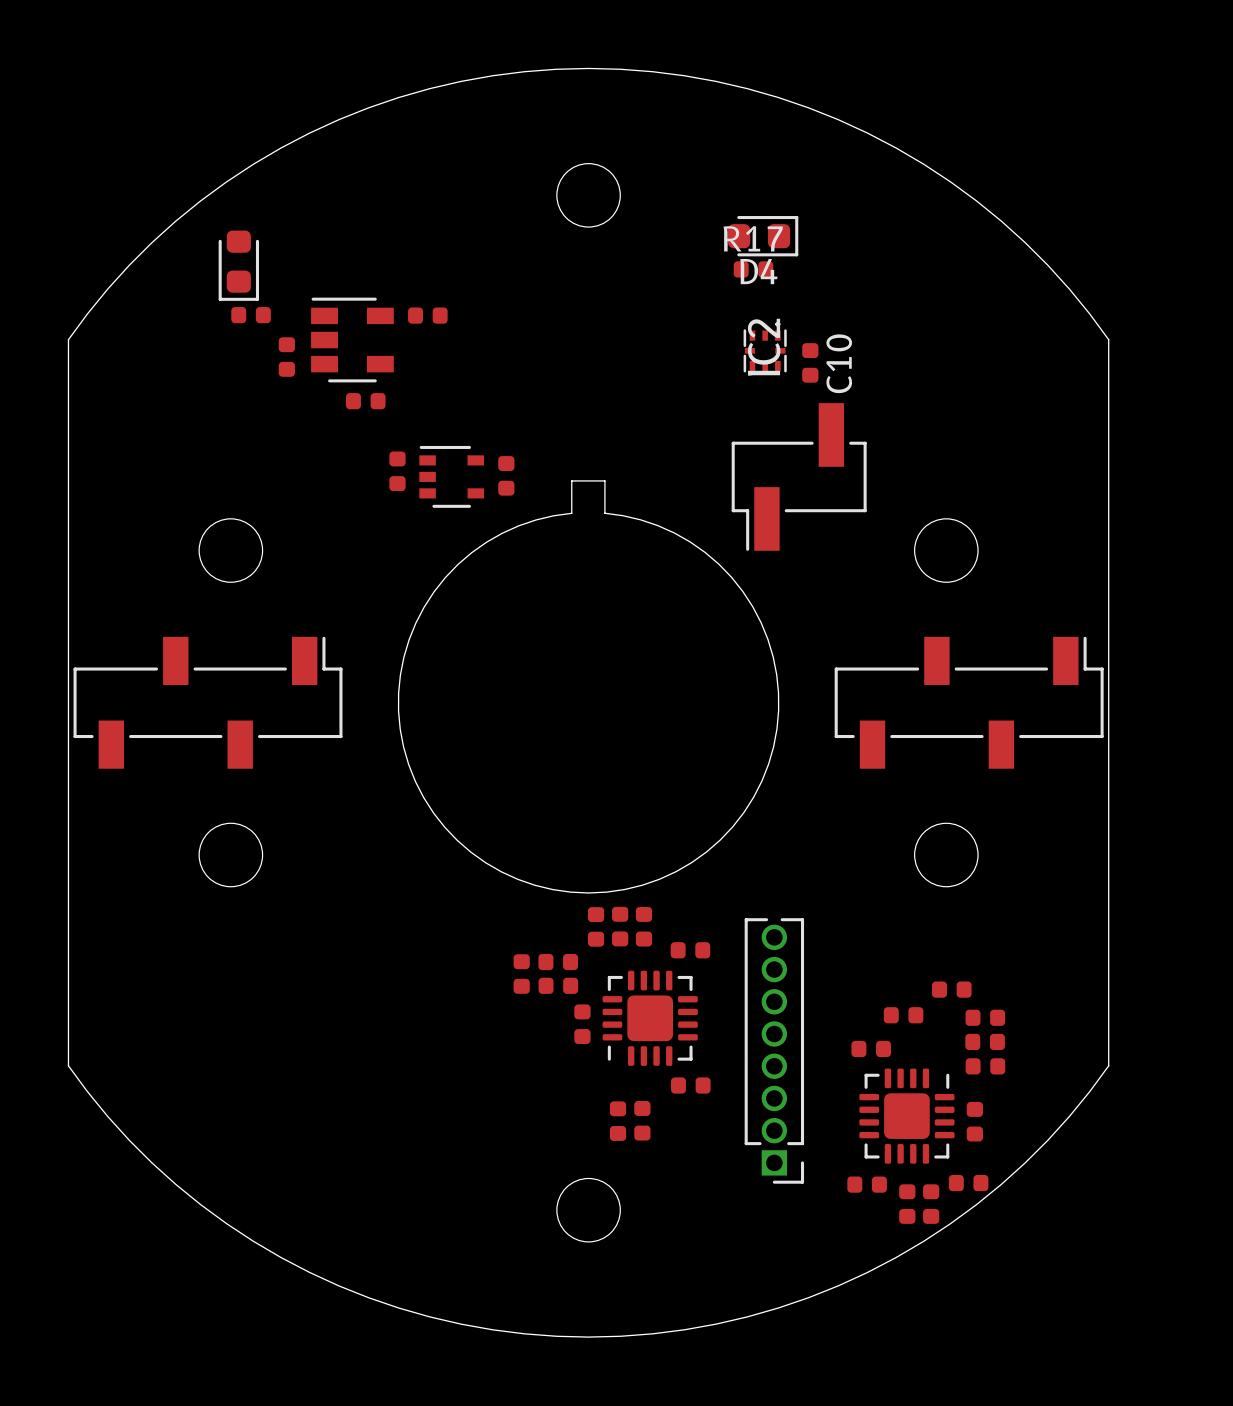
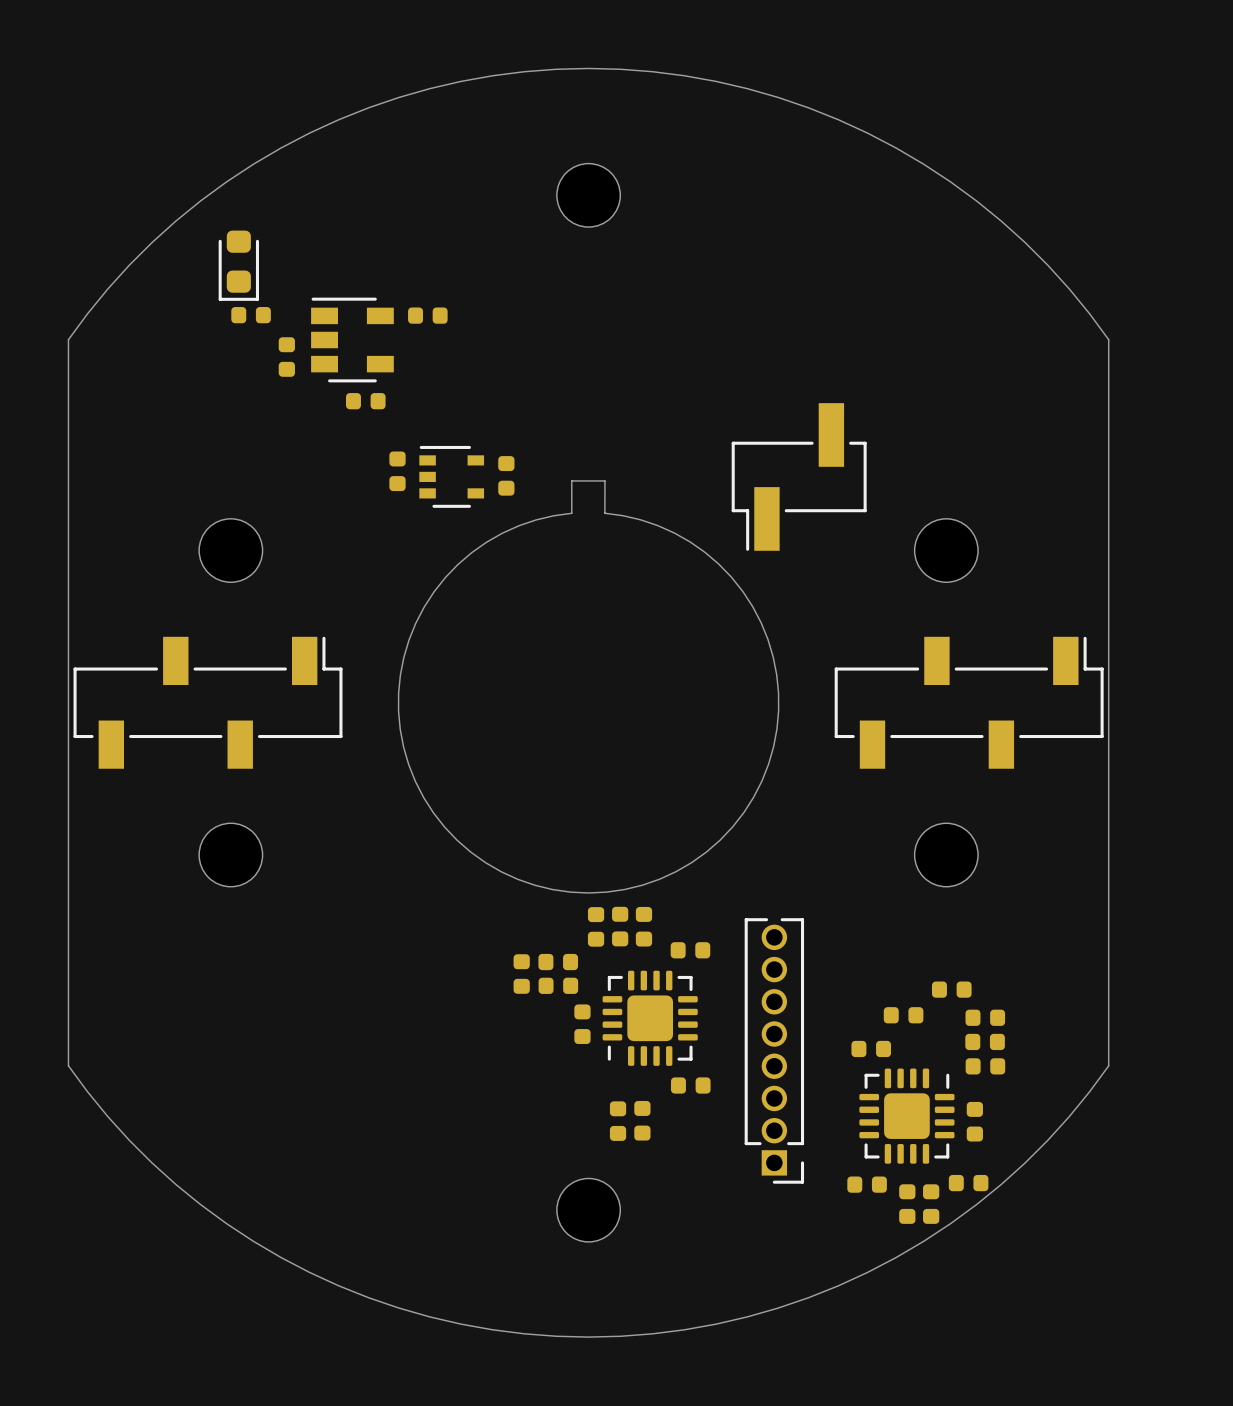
D4: (763, 236) -> none
R17: (753, 269) -> none
IC2: (765, 347) -> none
C10: (810, 362) -> none

